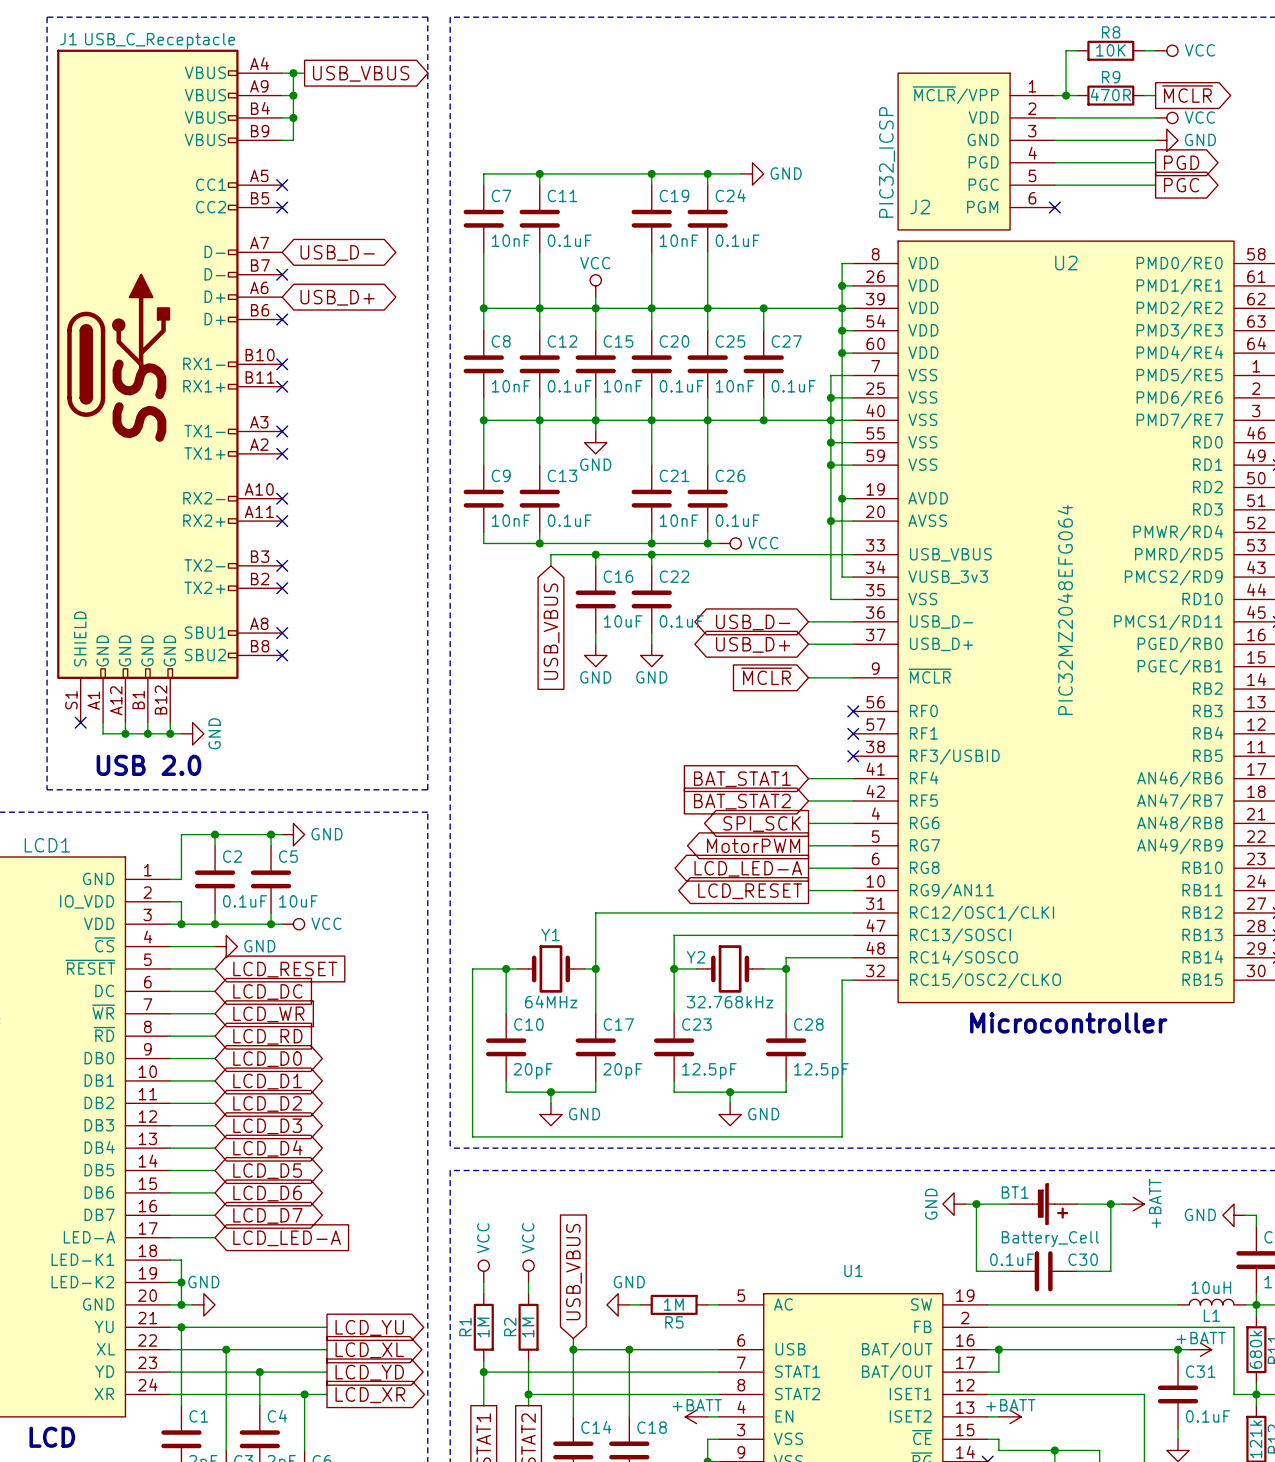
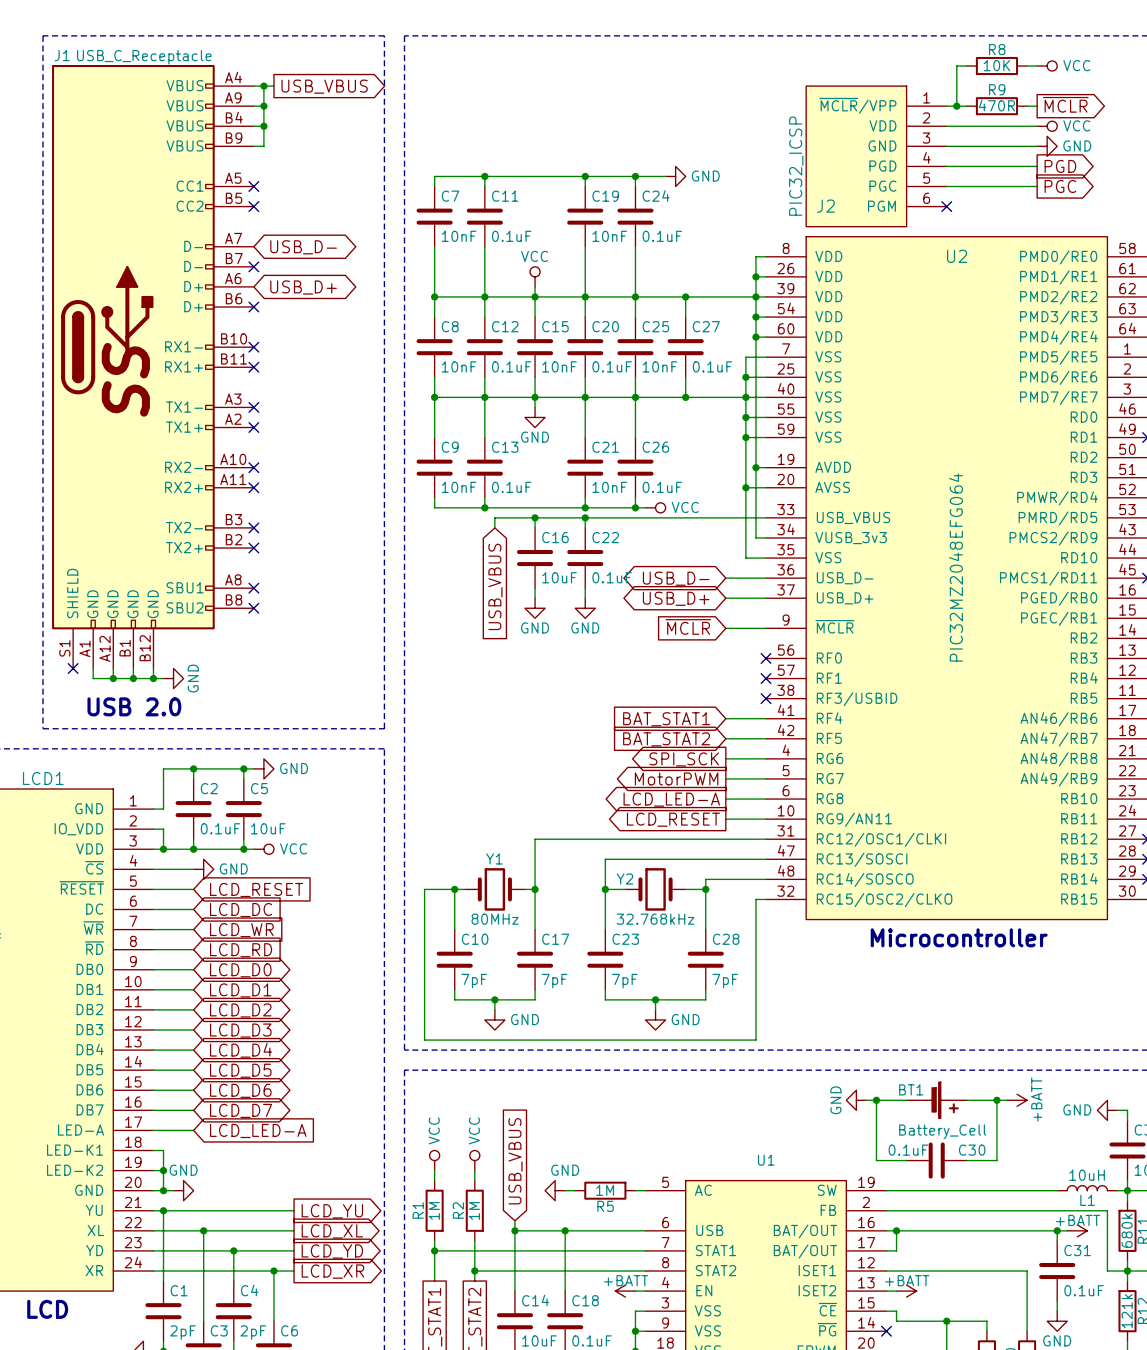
Y1 value: 64MHz (551, 1001) -> 80MHz (495, 919)
C10 value: 20pF (533, 1071) -> 7pF (474, 981)
C17 value: 20pF (622, 1071) -> 7pF (554, 981)
C23 value: 12.5pF (709, 1071) -> 7pF (624, 981)
C28 value: 12.5pF (821, 1071) -> 7pF (725, 981)

